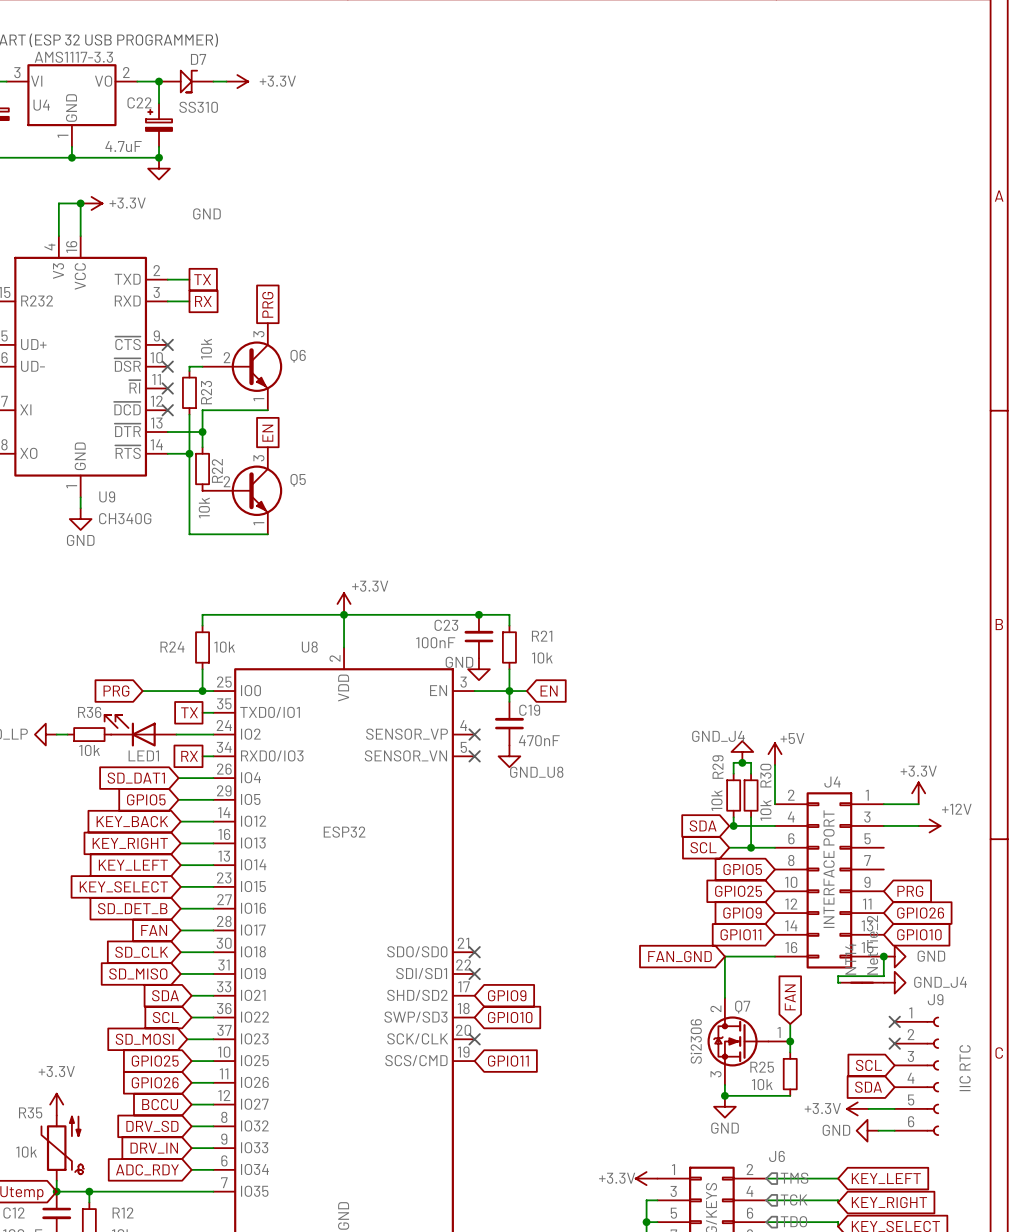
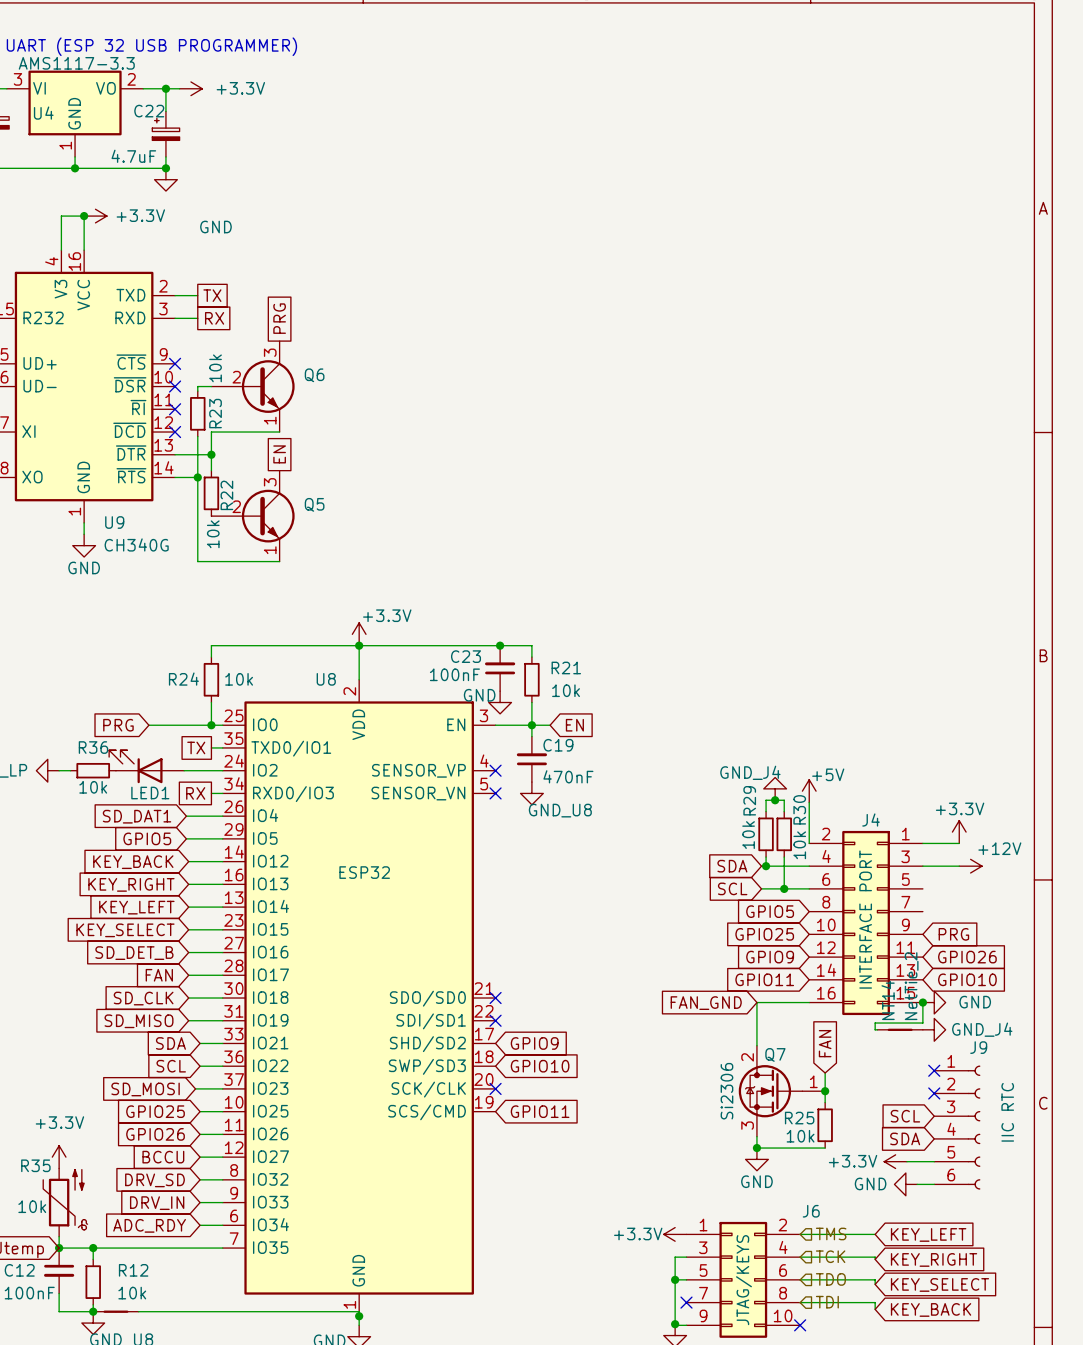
D7: SS310 (186, 81) -> none
power symbol position: +3.3V (237, 81) -> +3.3V (190, 88)

